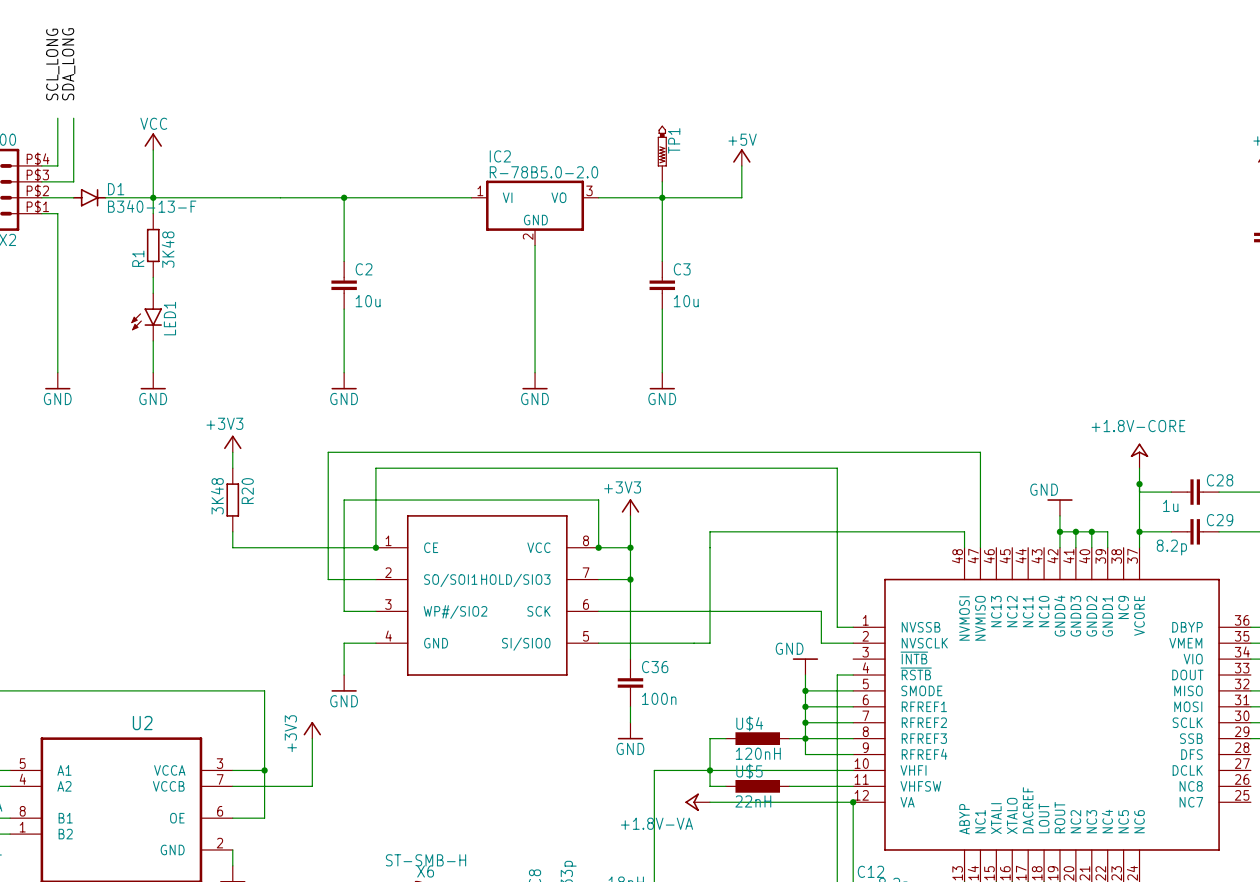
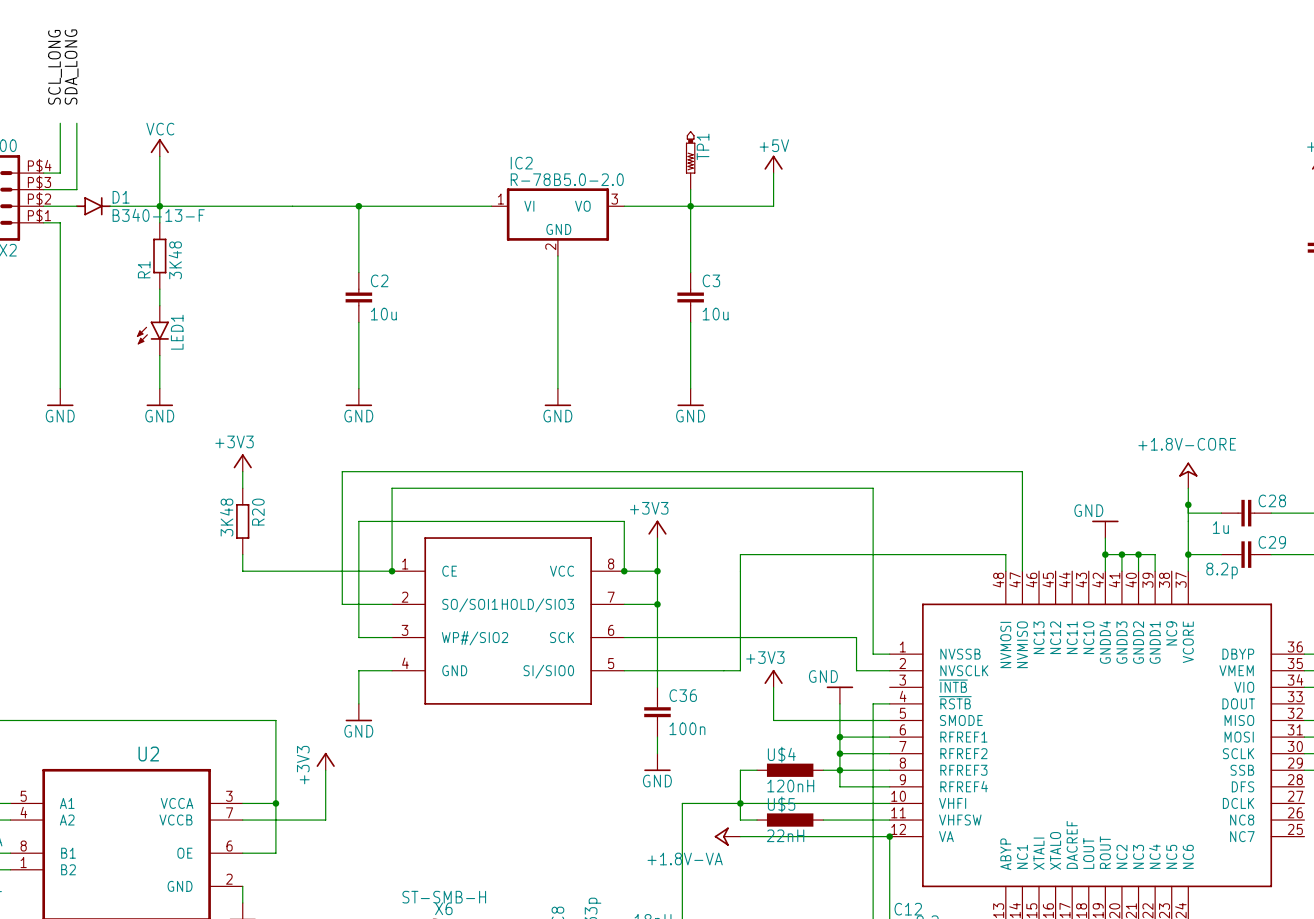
power symbol: none -> +3V3 (773, 678)
wire: none -> (773, 687) (773, 720) (839, 720)
junction: (805, 690) -> none

